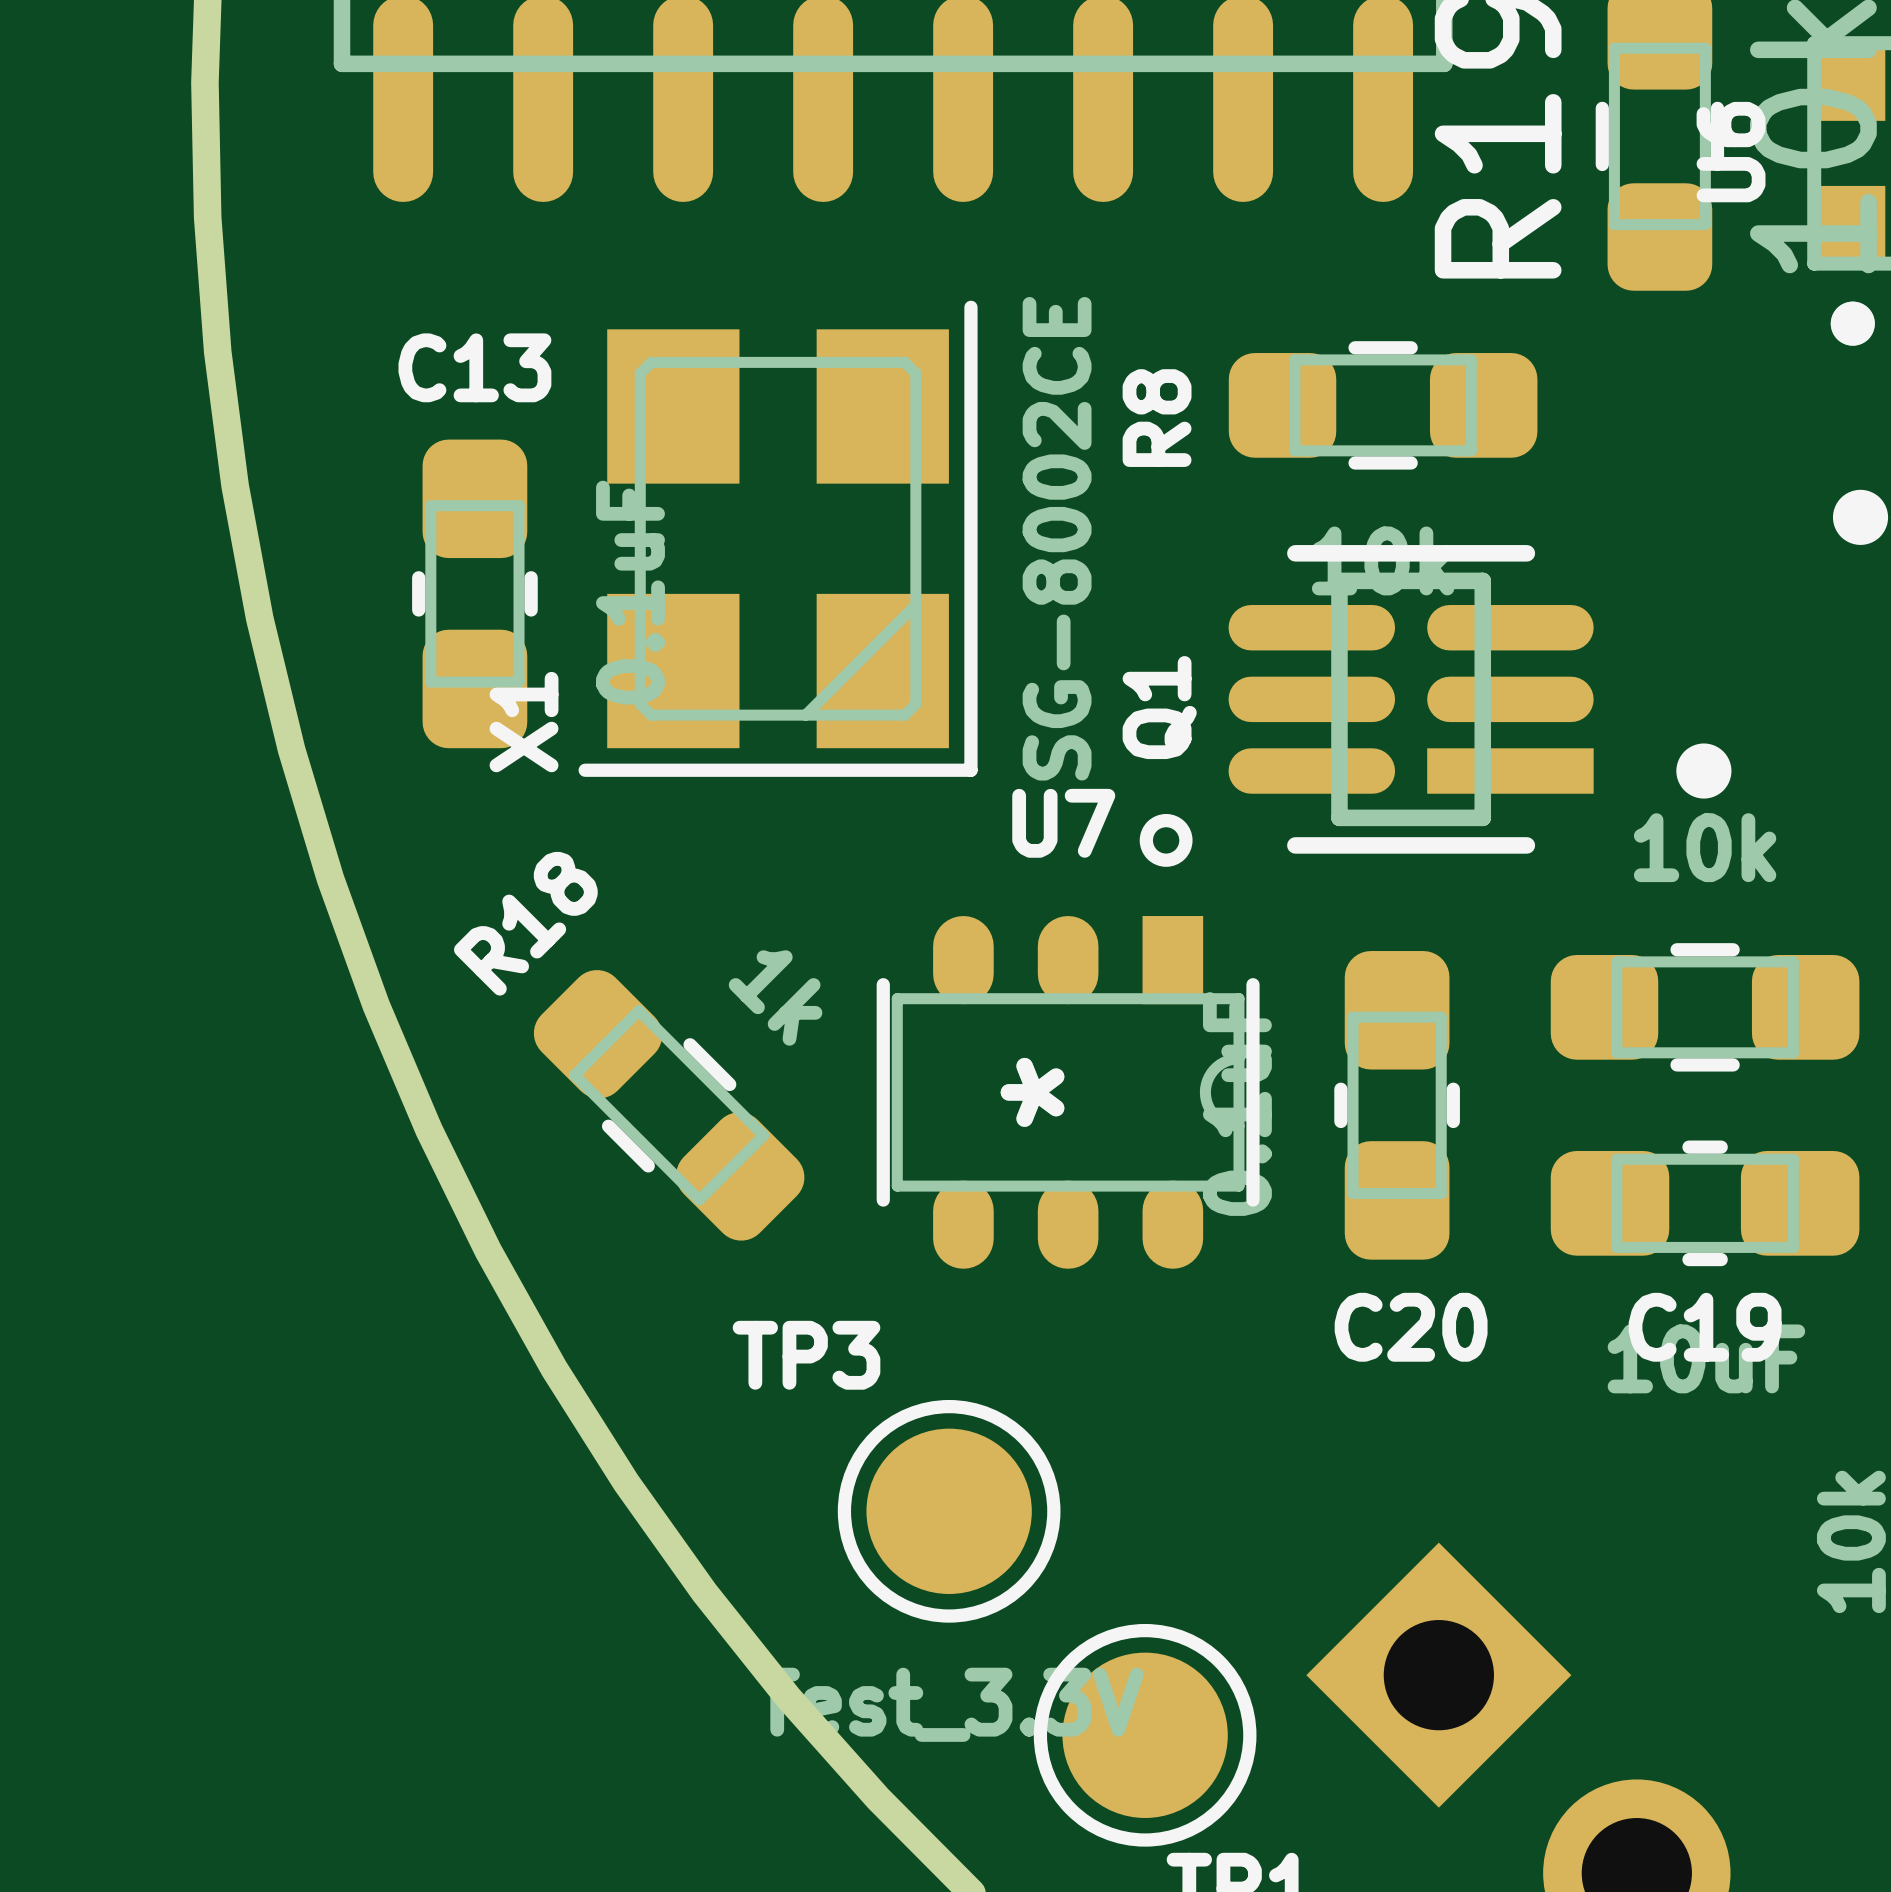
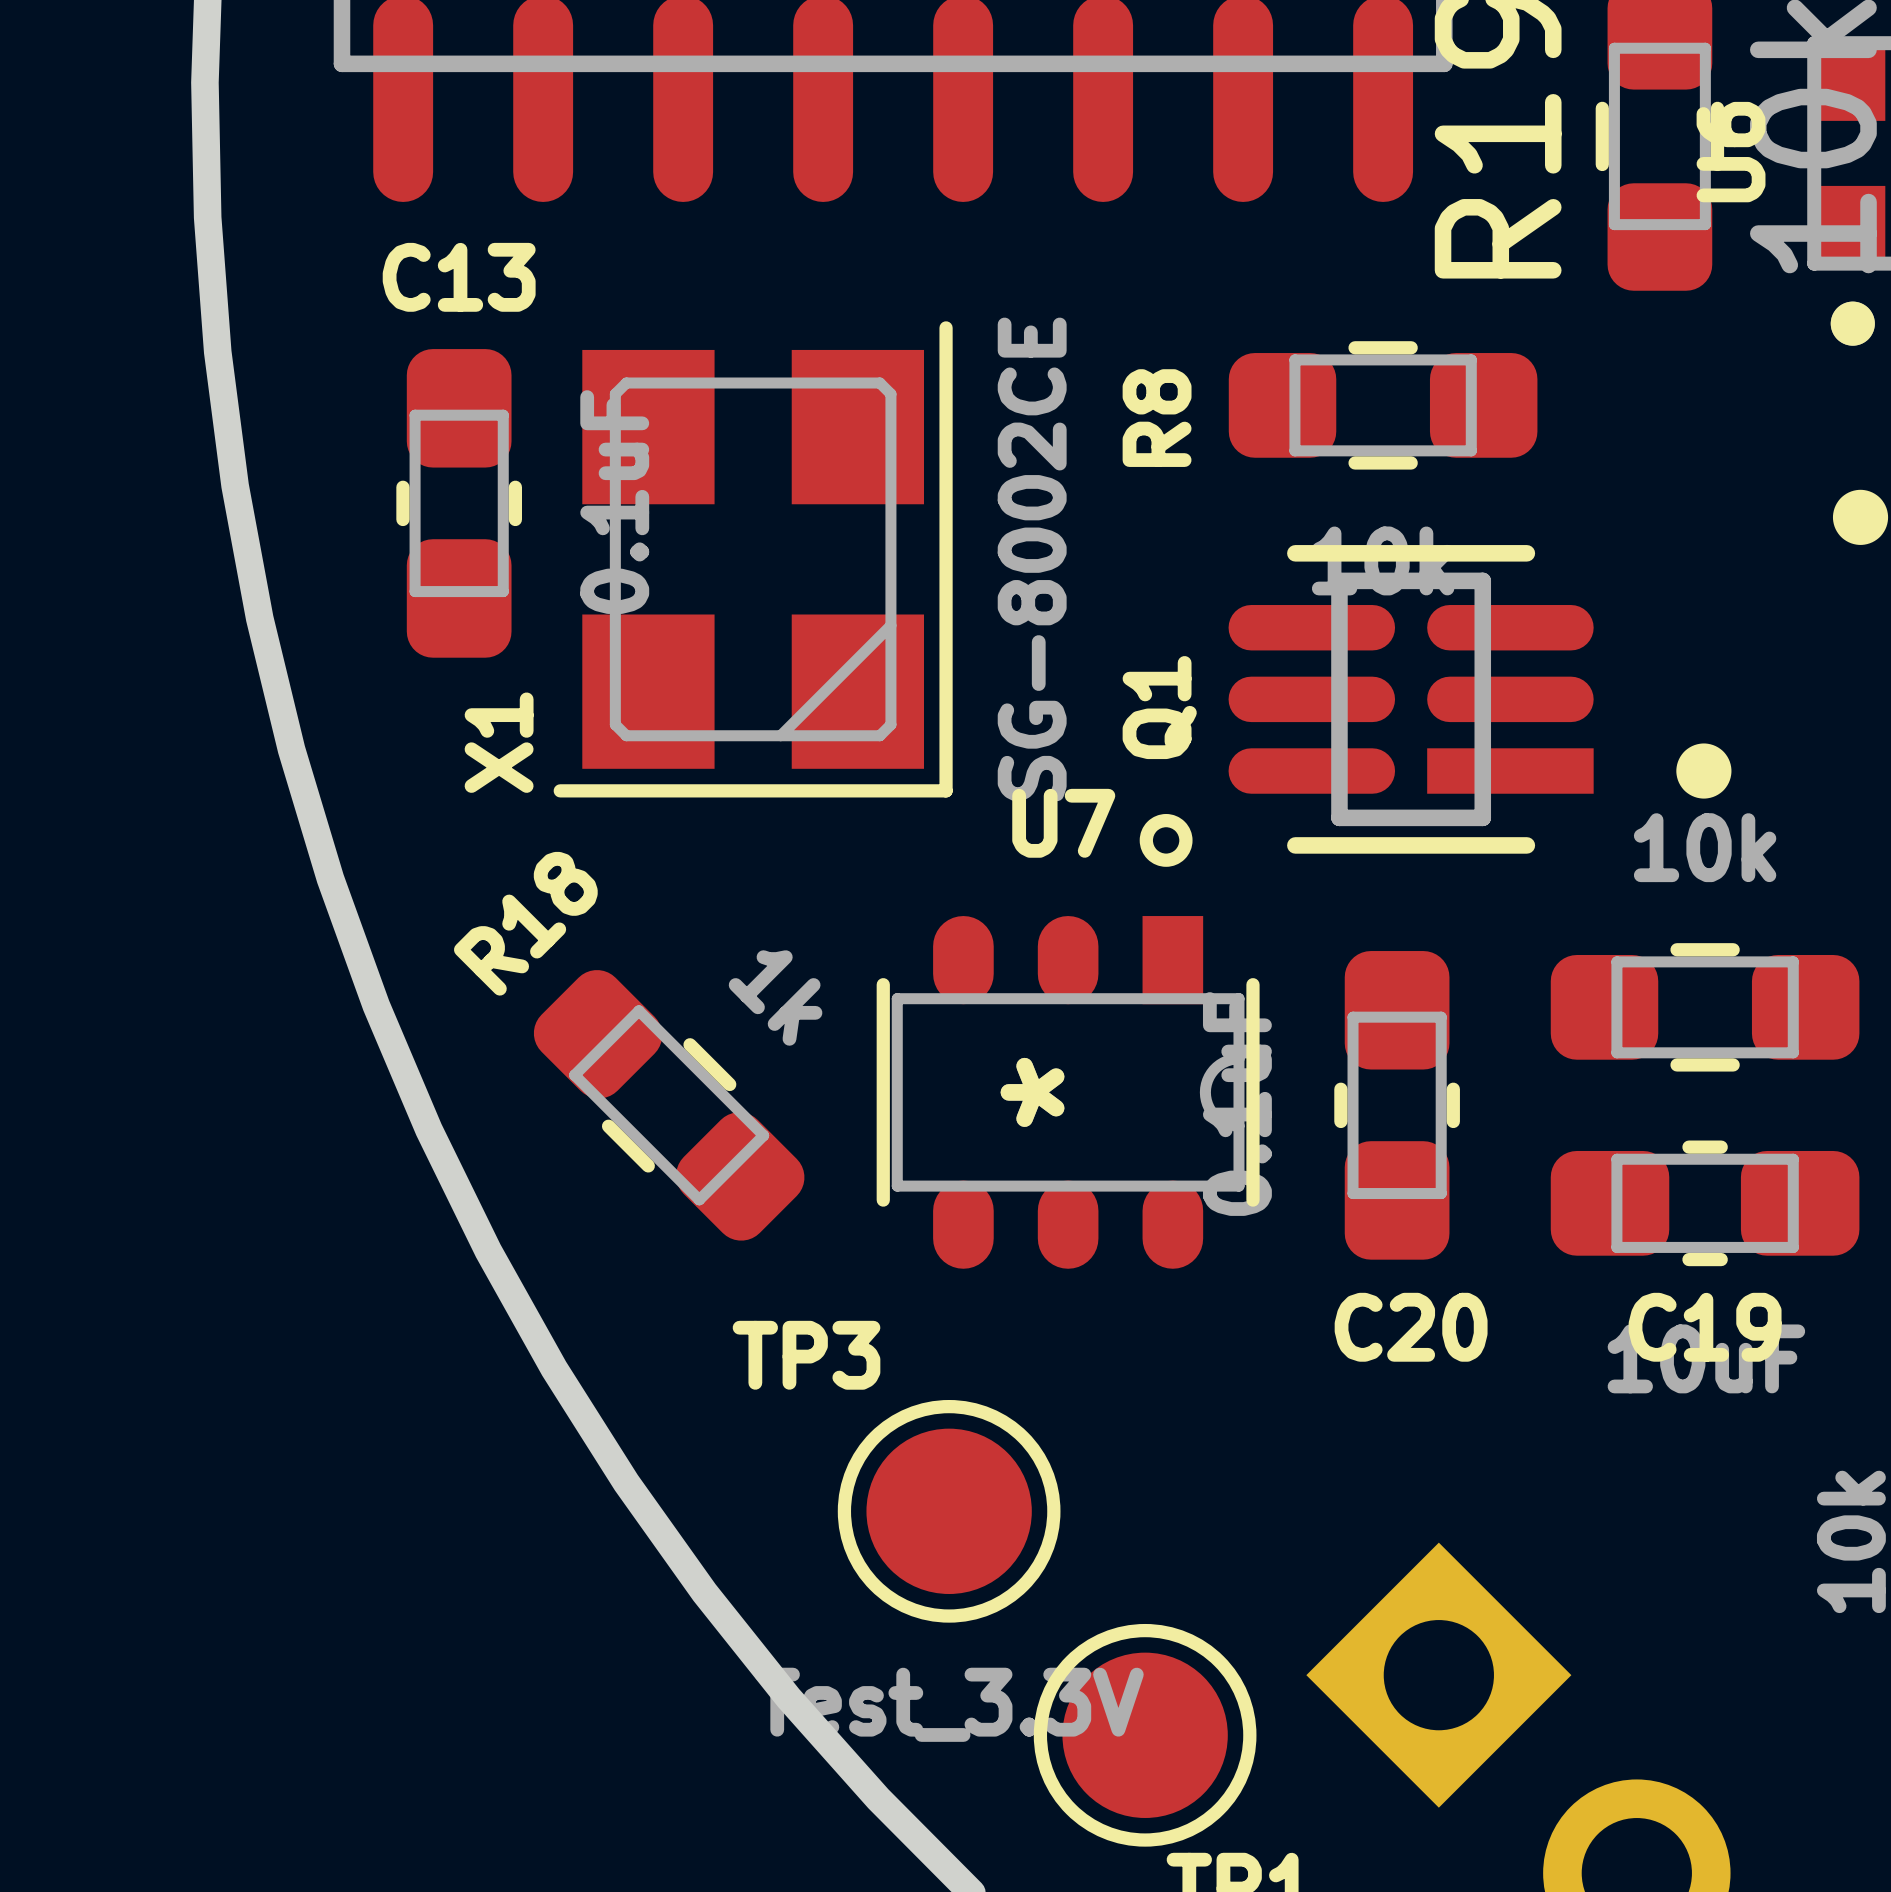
X1 position: (778, 538) -> (753, 559)
C13 position: (474, 593) -> (459, 503)

